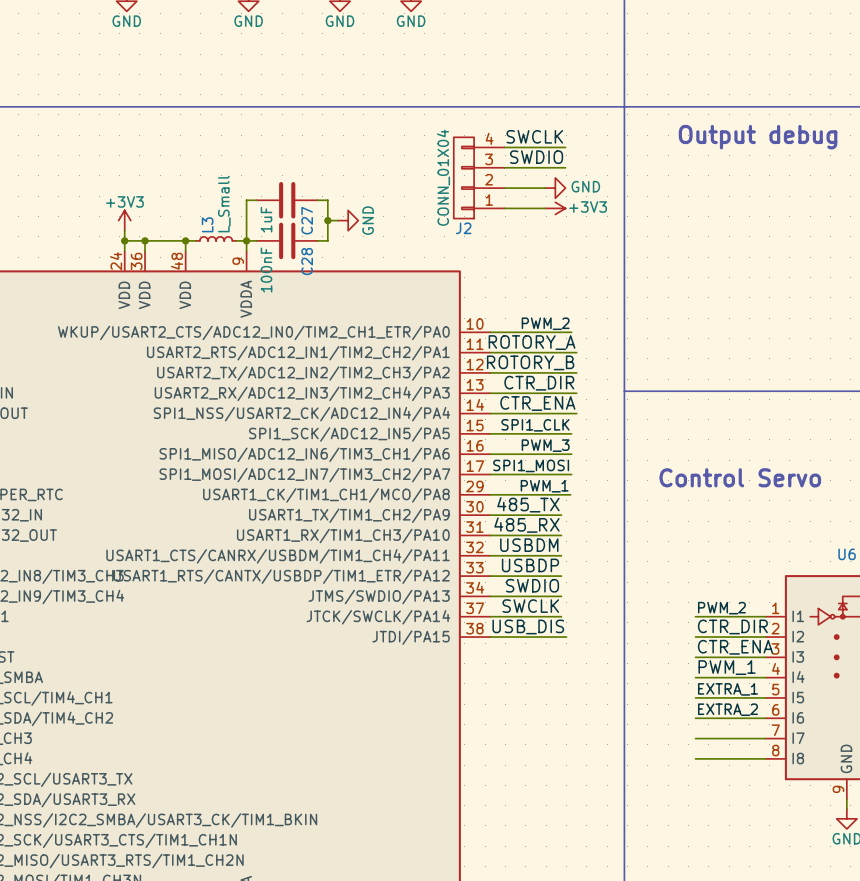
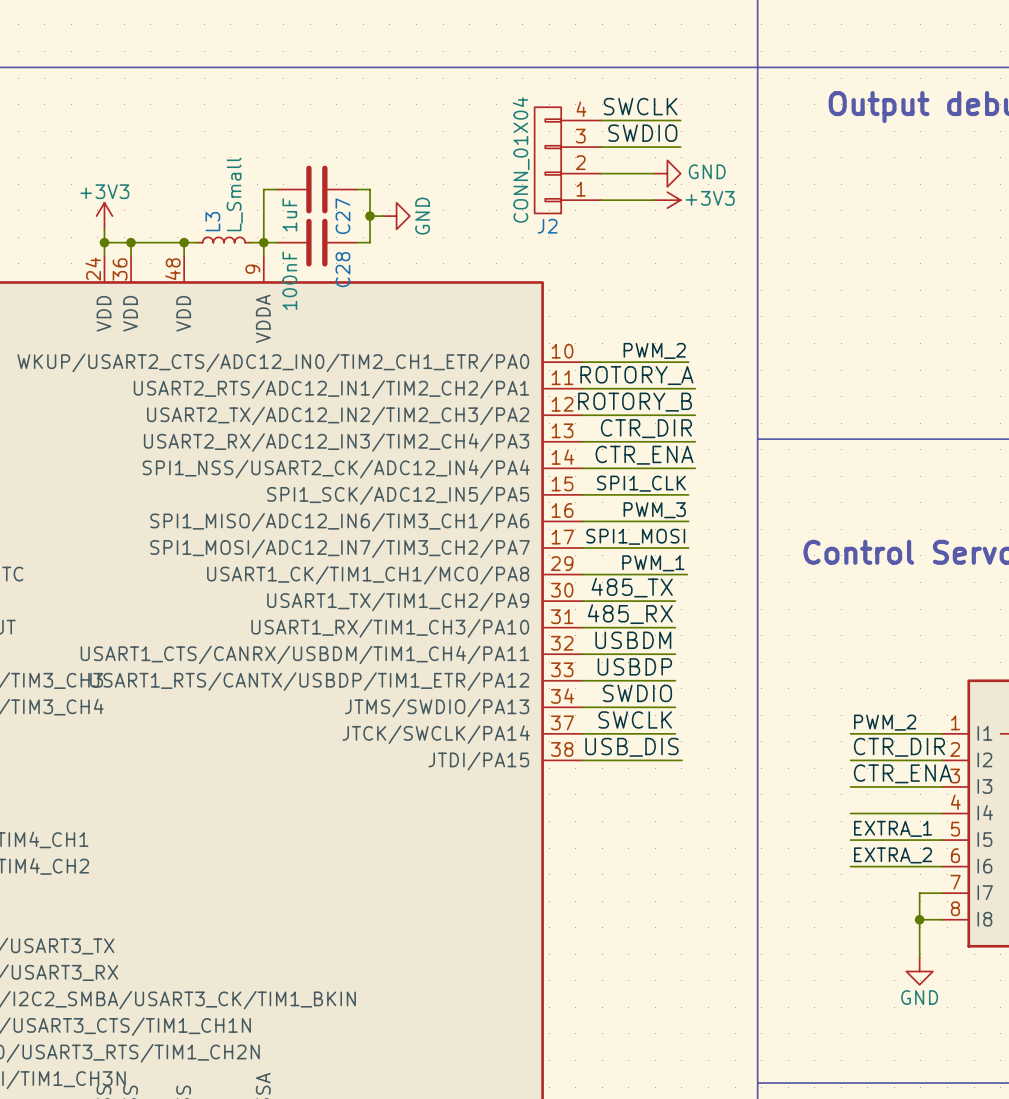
label: PWM_1 (727, 667) -> none
wire: (695, 738) (748, 738) -> (919, 958) (919, 893)
wire: (695, 758) (748, 758) -> none
junction: none -> (919, 919)
power symbol: none -> GND (919, 971)

